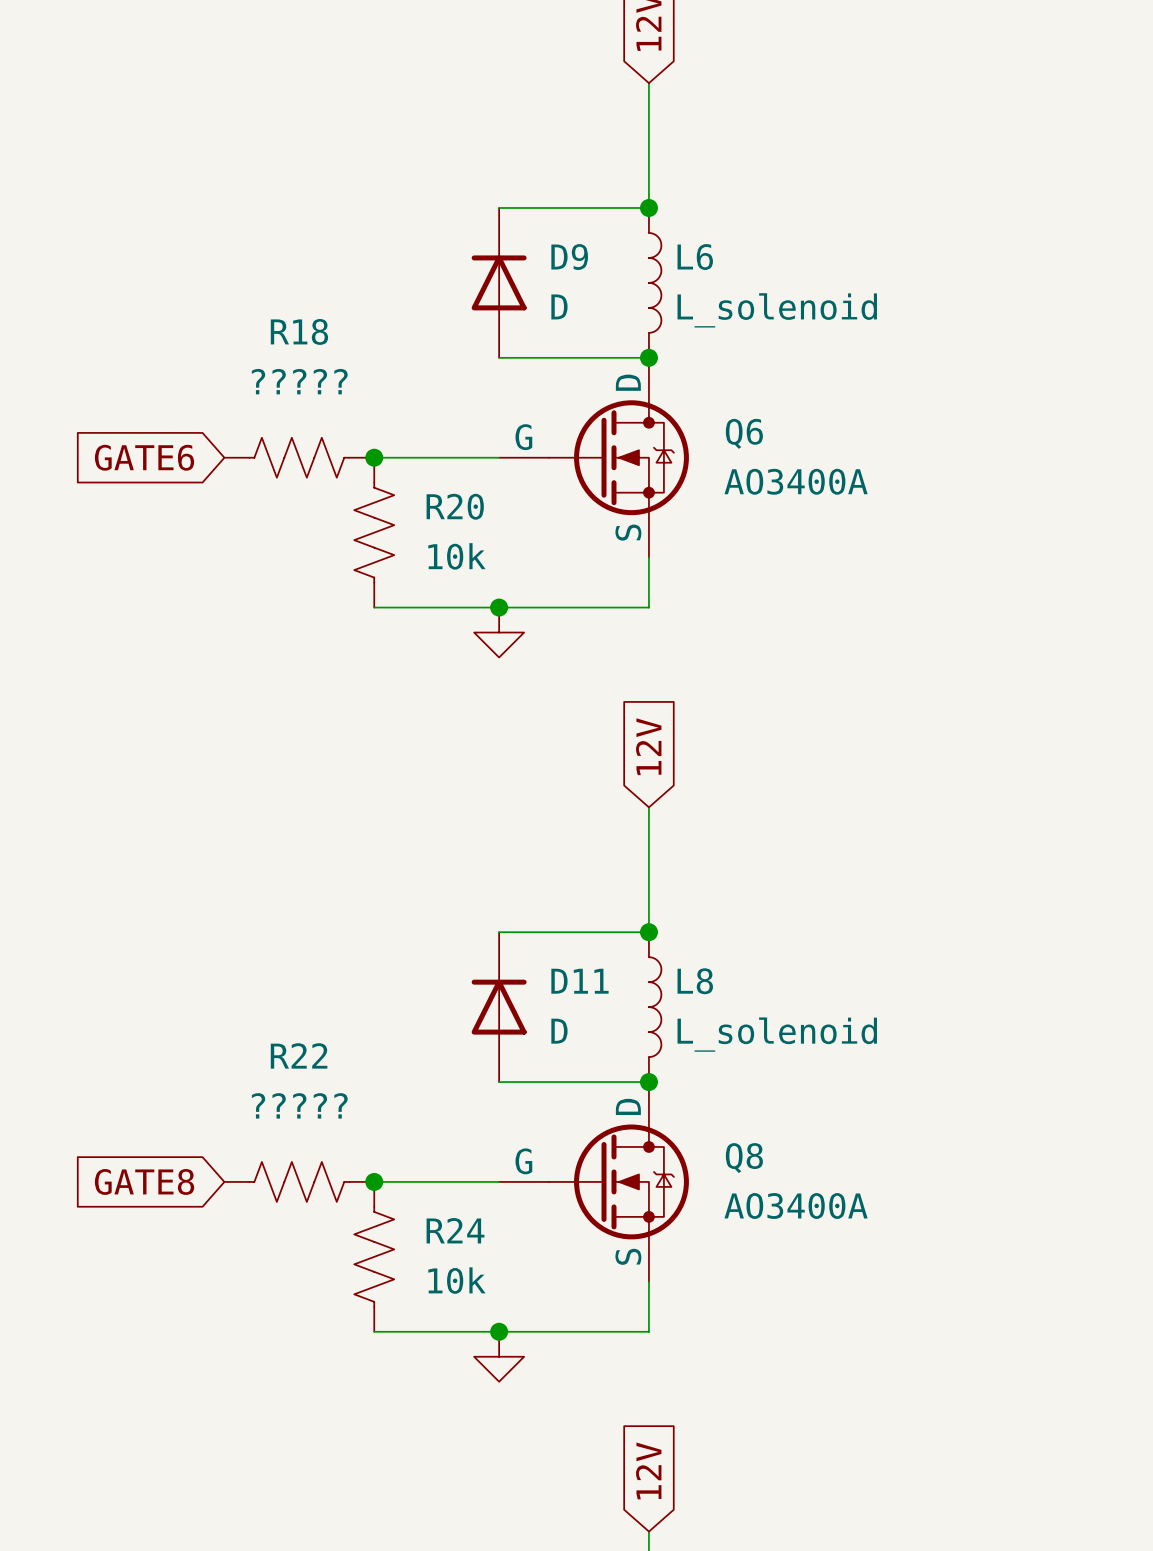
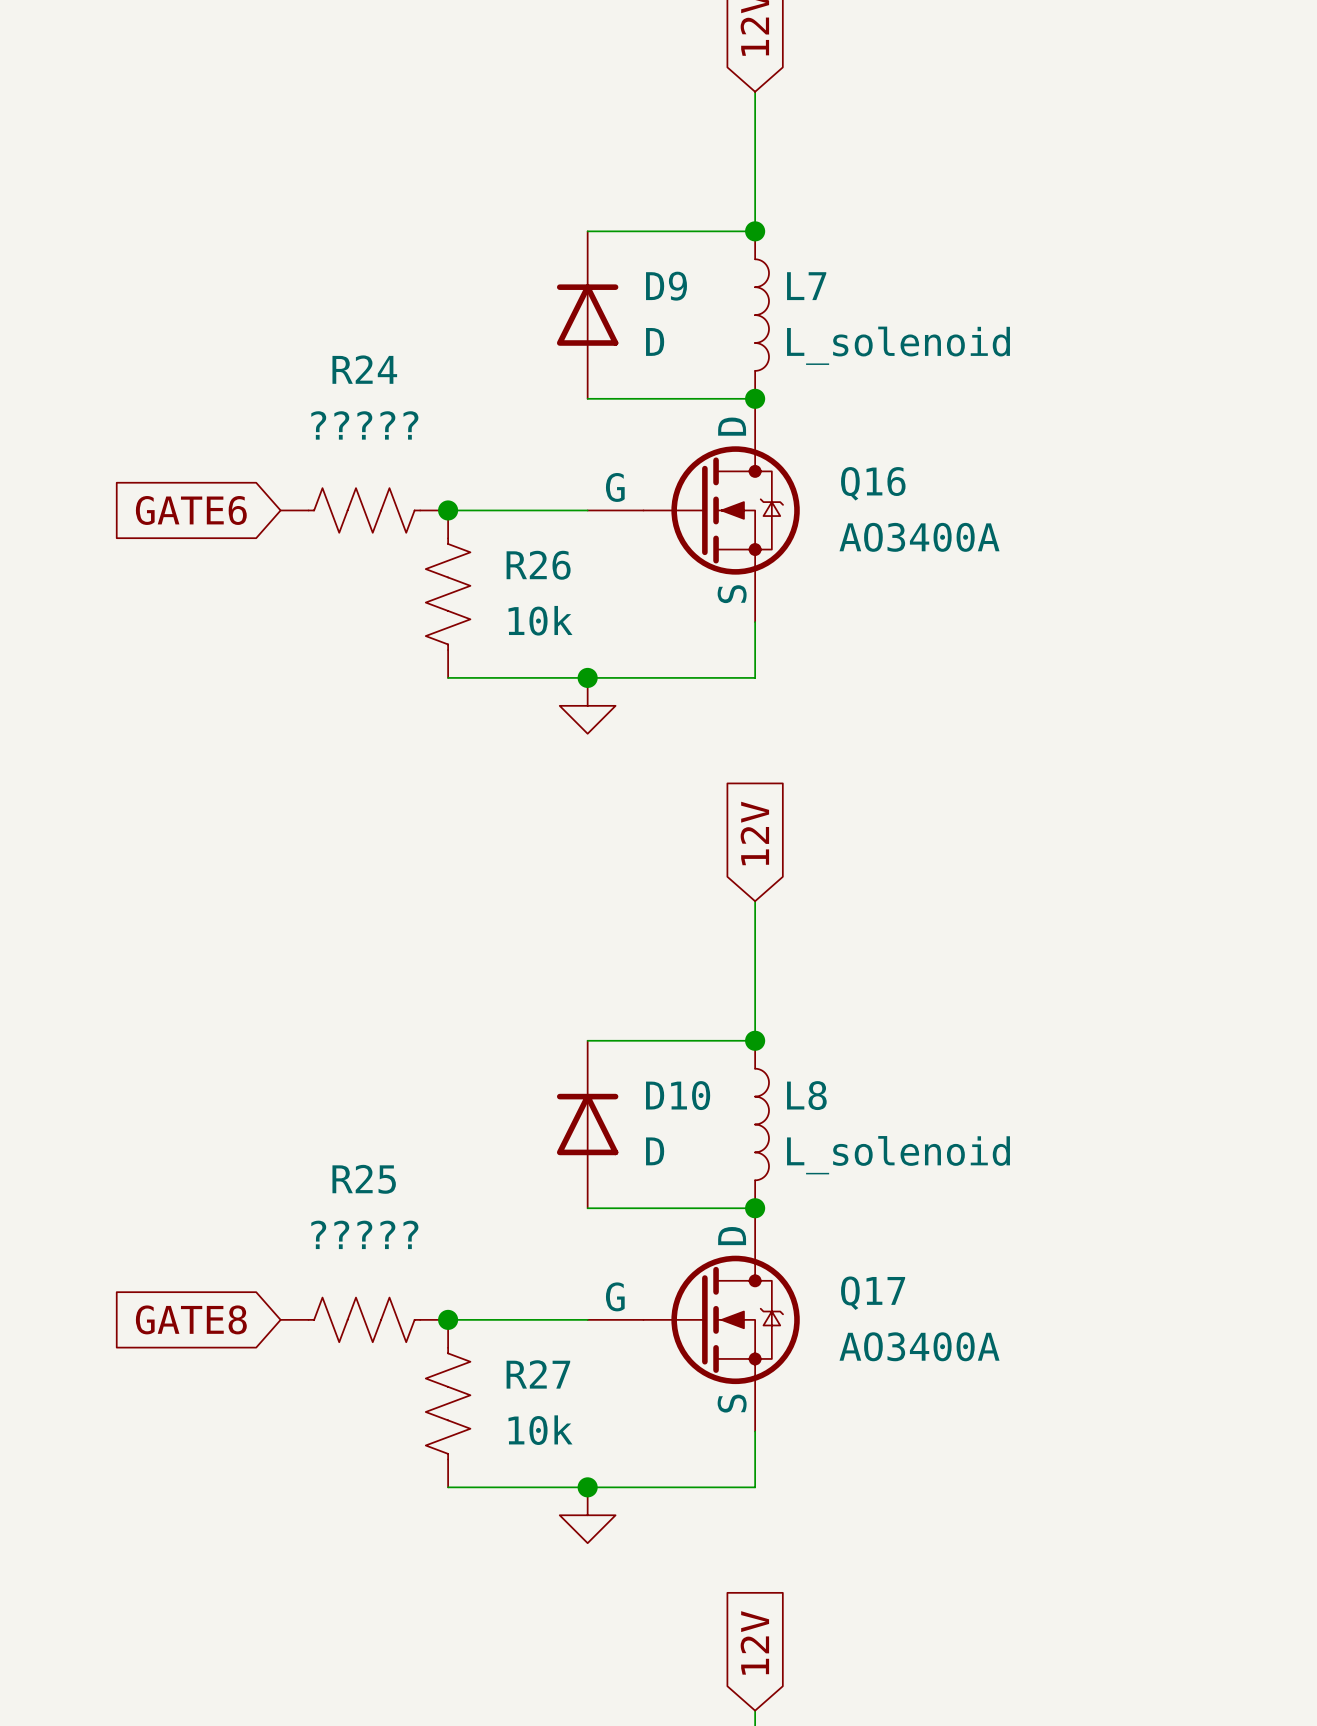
L6 name: L6 (695, 257) -> L7 (806, 286)
R18 name: R18 (299, 331) -> R24 (364, 369)
Q6 name: Q6 (744, 433) -> Q16 (873, 483)
R20 name: R20 (455, 506) -> R26 (538, 565)
D11 name: D11 (579, 981) -> D10 (678, 1095)
R22 name: R22 (299, 1055) -> R25 (364, 1179)
Q8 name: Q8 (744, 1158) -> Q17 (873, 1293)
R24 name: R24 (455, 1230) -> R27 (538, 1374)

